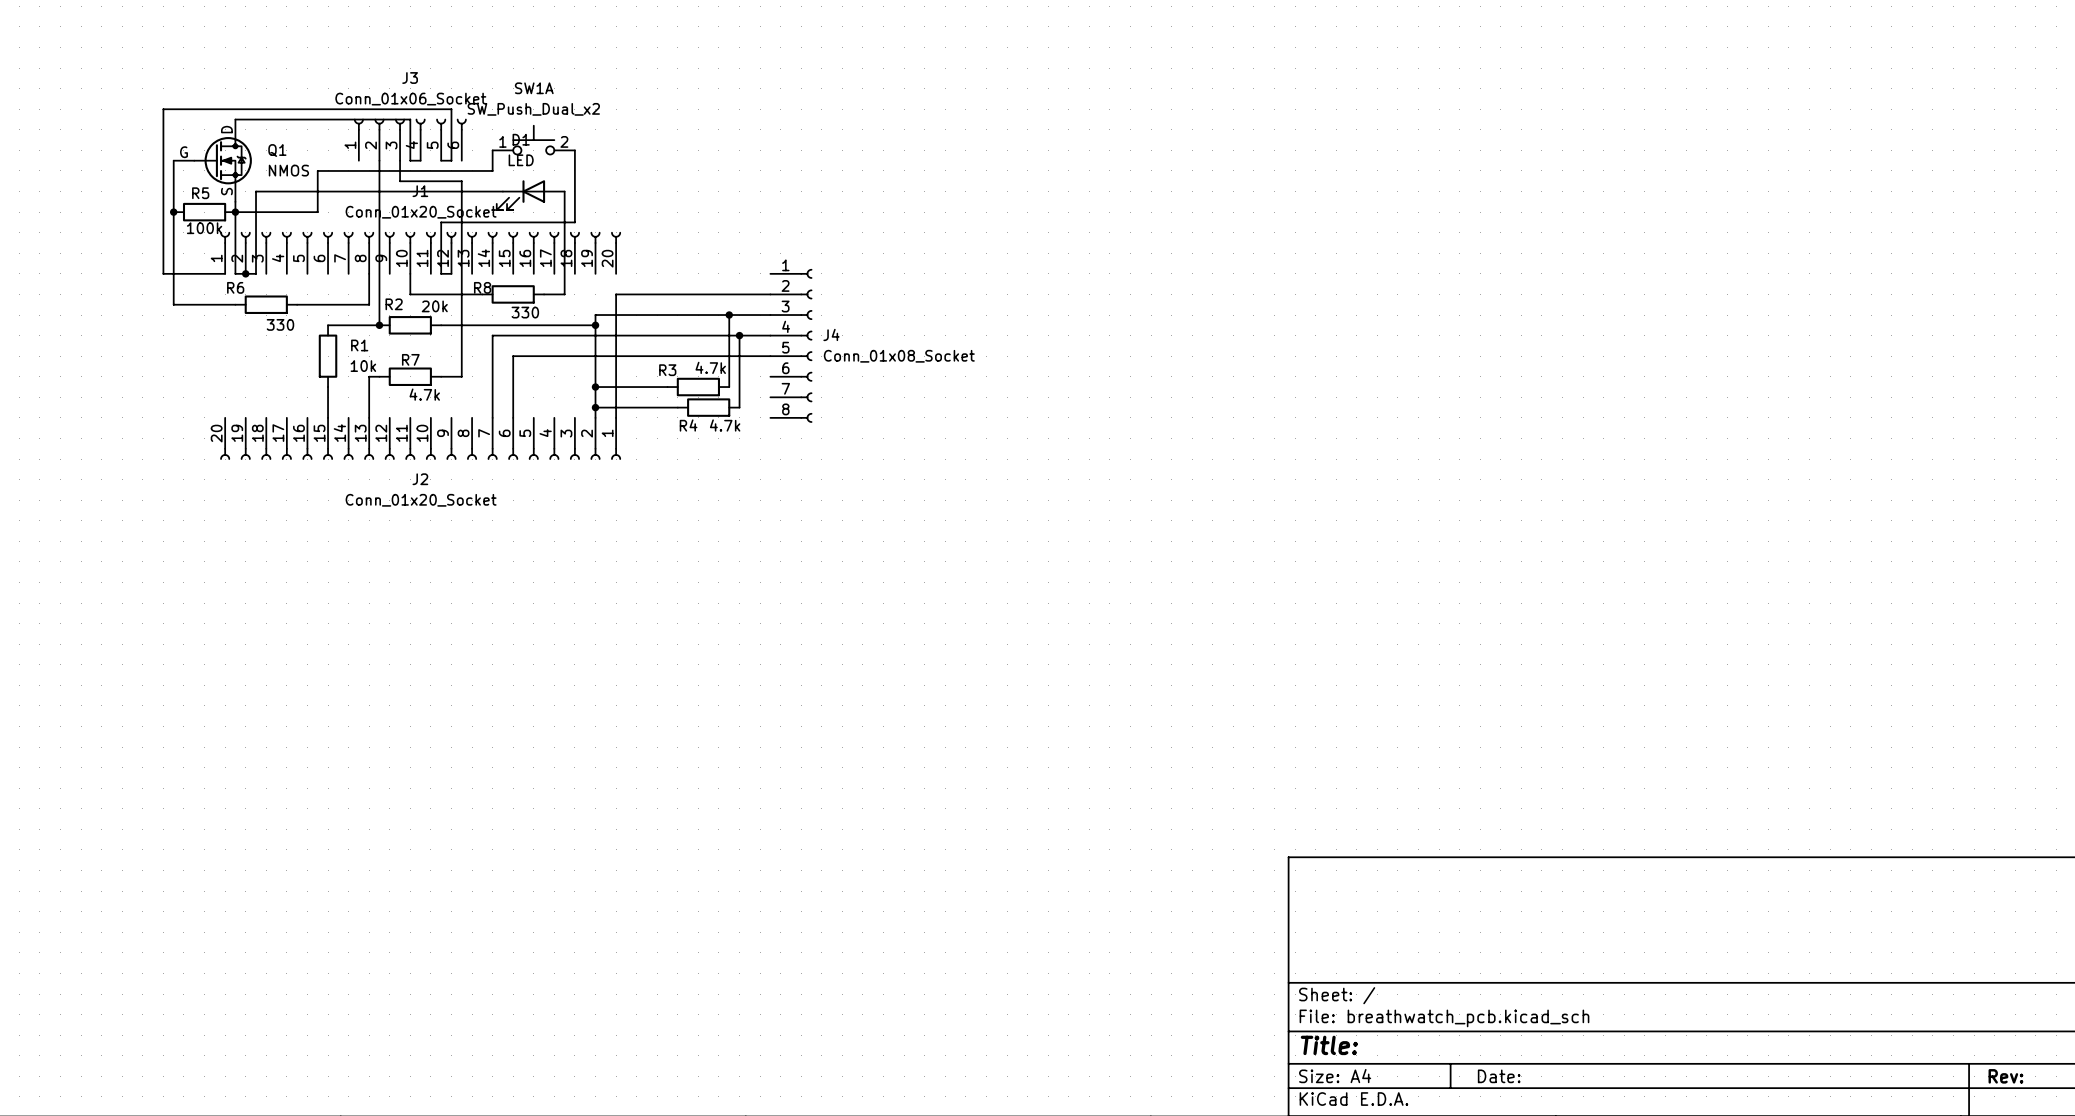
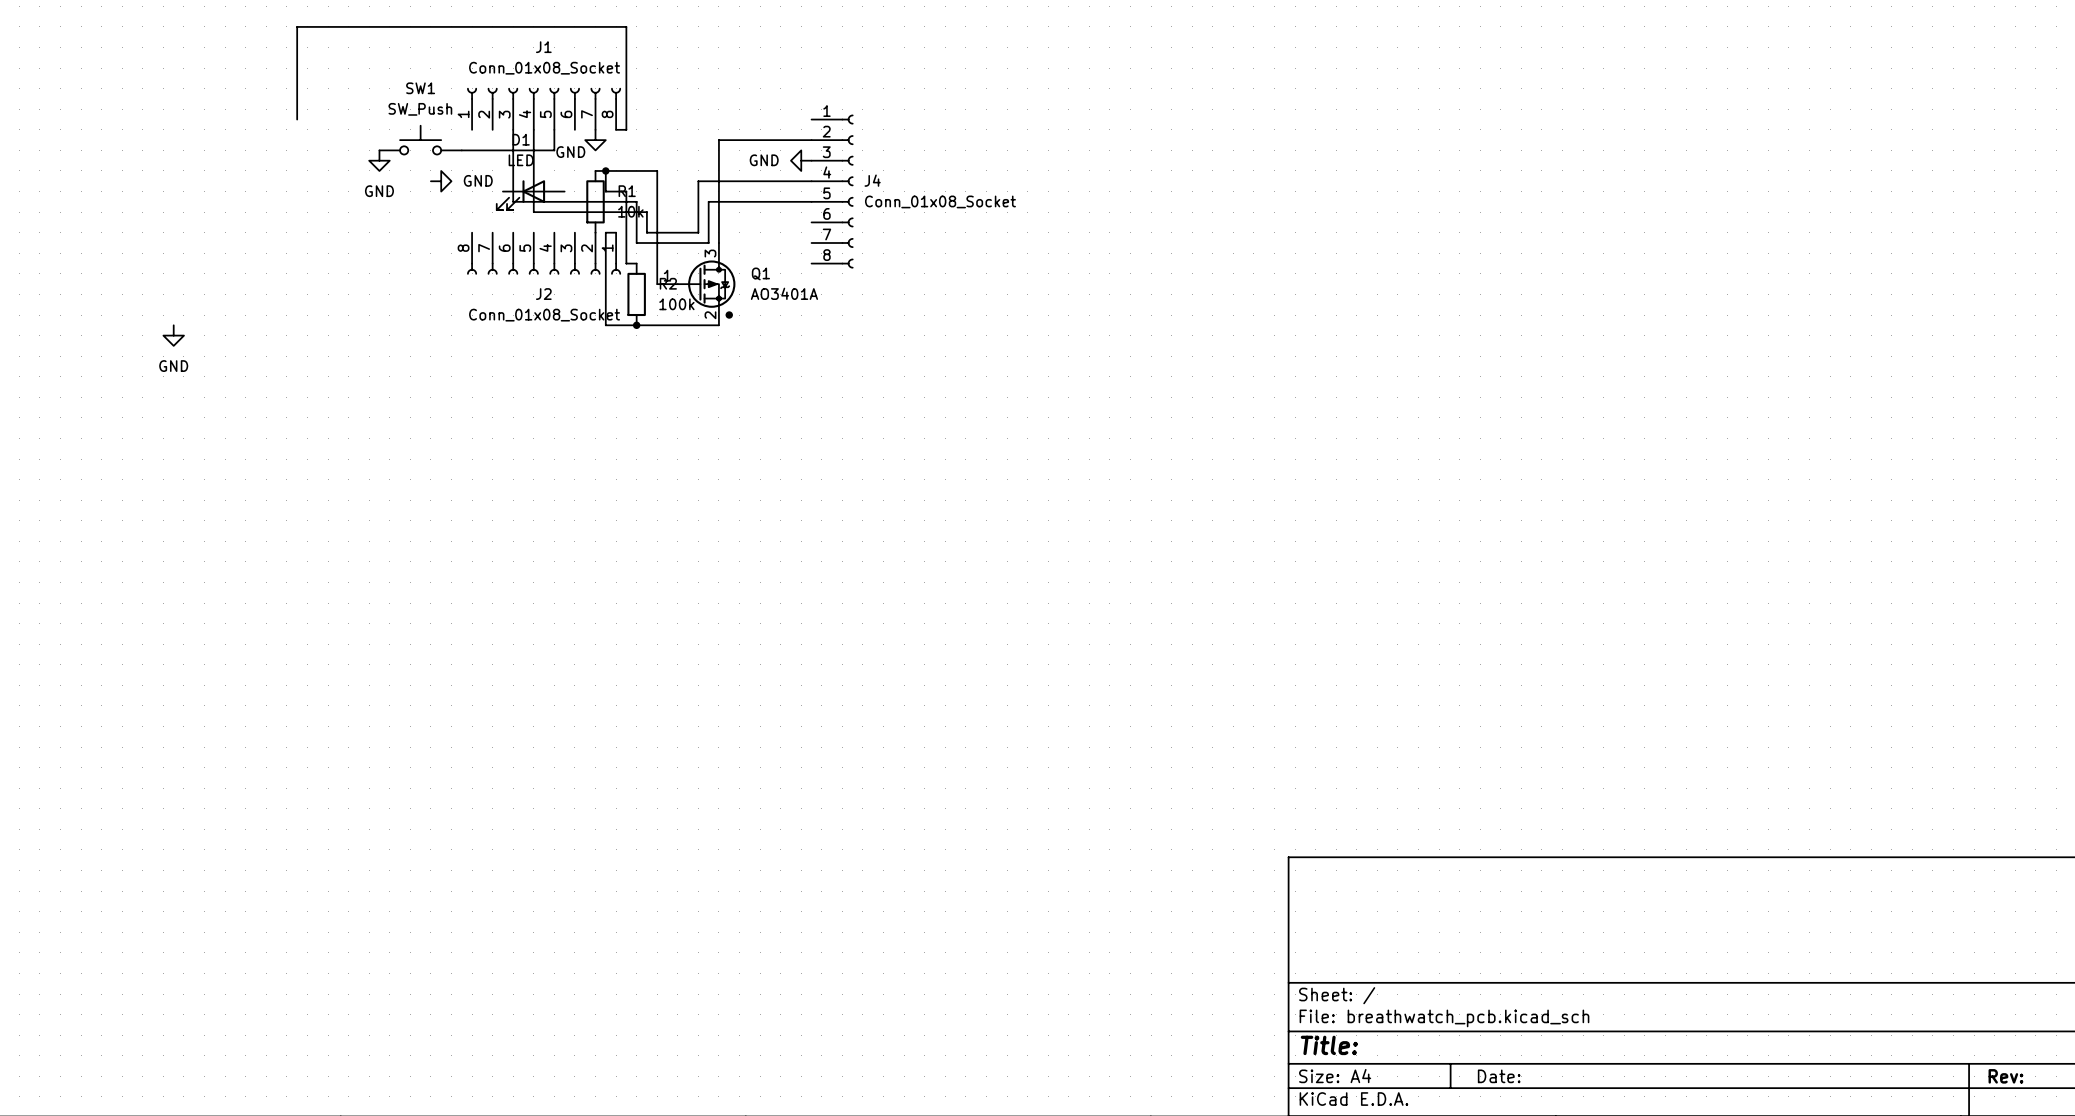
Q1 symbol: [173, 119, 252, 202] -> [657, 242, 736, 326]
wire: (235, 119) (410, 119) (410, 160) (420, 160) -> none
wire: none -> (297, 119) (297, 26) (626, 26) (626, 129) (616, 129)
wire: none -> (513, 129) (513, 201) (636, 201) (636, 242) (708, 242) (708, 201) (811, 201)
wire: none -> (533, 129) (533, 212) (646, 212) (646, 232) (698, 232) (698, 181) (811, 181)
wire: none -> (554, 129) (554, 150) (461, 150)
J3: Conn_01x06_Socket (410, 139) -> none
SW1: none -> SW_Push (420, 140)
SW1A: SW_Push_Dual_x2 (533, 140) -> none
power symbol: none -> GND (595, 140)
wire: none -> (811, 140) (718, 140) (718, 242)
wire: (492, 150) (492, 170) (317, 170) (317, 212) (235, 212) -> none
wire: (574, 150) (574, 222) (441, 222) (441, 273) (451, 273) -> none
wire: (173, 160) (173, 304) (235, 304) -> none
wire: (379, 160) (379, 325) (328, 325) -> none
power symbol: none -> GND (379, 160)
wire: (400, 160) (400, 181) (461, 181) (461, 376) (441, 376) -> none
wire: (441, 160) (451, 160) (451, 109) (163, 109) (163, 273) (225, 273) -> none
power symbol: none -> GND (801, 160)
Q1 value: NMOS (288, 170) -> AO3401A (784, 293)
wire: none -> (595, 170) (657, 170) (657, 284)
wire: none -> (605, 170) (605, 191) (626, 191) (626, 263) (636, 263)
junction: none -> (605, 170)
power symbol: none -> GND (441, 181)
wire: (502, 191) (256, 191) (256, 273) (235, 273) (235, 201) -> none
wire: (564, 191) (564, 294) (544, 294) -> none
junction: (173, 212) -> none
R5: 100k (204, 212) -> none
junction: (235, 212) -> none
J1 value: Conn_01x20_Socket (421, 212) -> Conn_01x08_Socket (544, 68)
J1 symbol: [220, 232, 621, 274] -> [467, 88, 621, 130]
wire: none -> (616, 232) (605, 232) (605, 325) (718, 325)
junction: (245, 273) -> none
wire: (369, 273) (369, 304) (297, 304) -> none
wire: (410, 273) (410, 294) (482, 294) -> none
R8: 330 (513, 294) -> none
wire: (770, 294) (616, 294) (616, 417) -> none
R6: 330 (266, 304) -> none
R2 value: 20k (434, 306) -> 100k (676, 304)
wire: (729, 315) (729, 387) -> none
wire: (770, 315) (595, 315) (595, 417) -> none
junction: (379, 325) -> none
R2 rotation: 0° (410, 325) -> 90° clockwise (636, 294)
R2 position: (410, 325) -> (636, 294)
wire: (441, 325) (595, 325) -> none
junction: (595, 325) -> none
junction: none -> (636, 325)
power symbol: none -> GND (173, 335)
wire: (739, 335) (739, 407) -> none
junction: (739, 335) -> none
wire: (770, 335) (492, 335) (492, 417) -> none
J4 position: (791, 345) -> (832, 191)
R1 position: (328, 356) -> (595, 201)
wire: (770, 356) (513, 356) (513, 417) -> none
wire: (379, 376) (369, 376) (369, 417) -> none
R7: 4.7k (410, 376) -> none
wire: (328, 387) (328, 417) -> none
wire: (595, 387) (667, 387) -> none
junction: (595, 387) -> none
R3: 4.7k (698, 387) -> none
wire: (595, 407) (677, 407) -> none
junction: (595, 407) -> none
R4: 4.7k (708, 407) -> none
J2 symbol: [220, 417, 621, 460] -> [467, 232, 621, 275]
J2 value: Conn_01x20_Socket (421, 500) -> Conn_01x08_Socket (544, 315)

